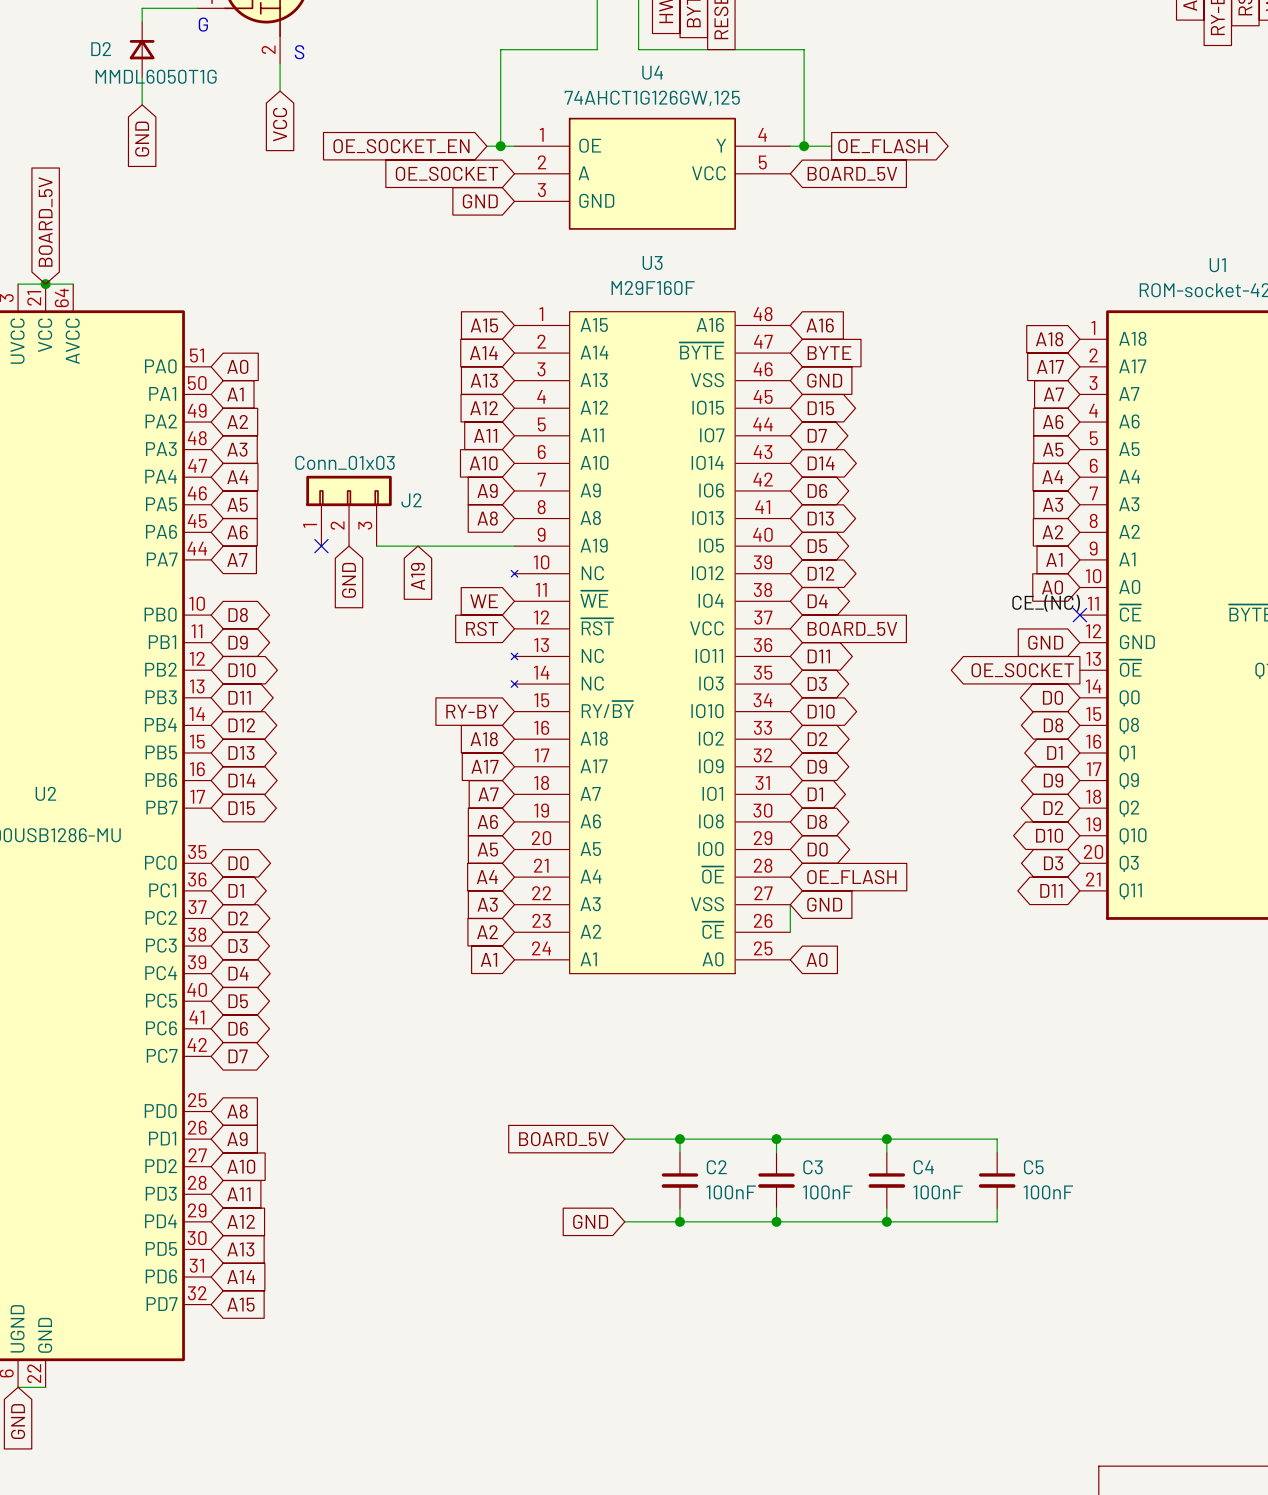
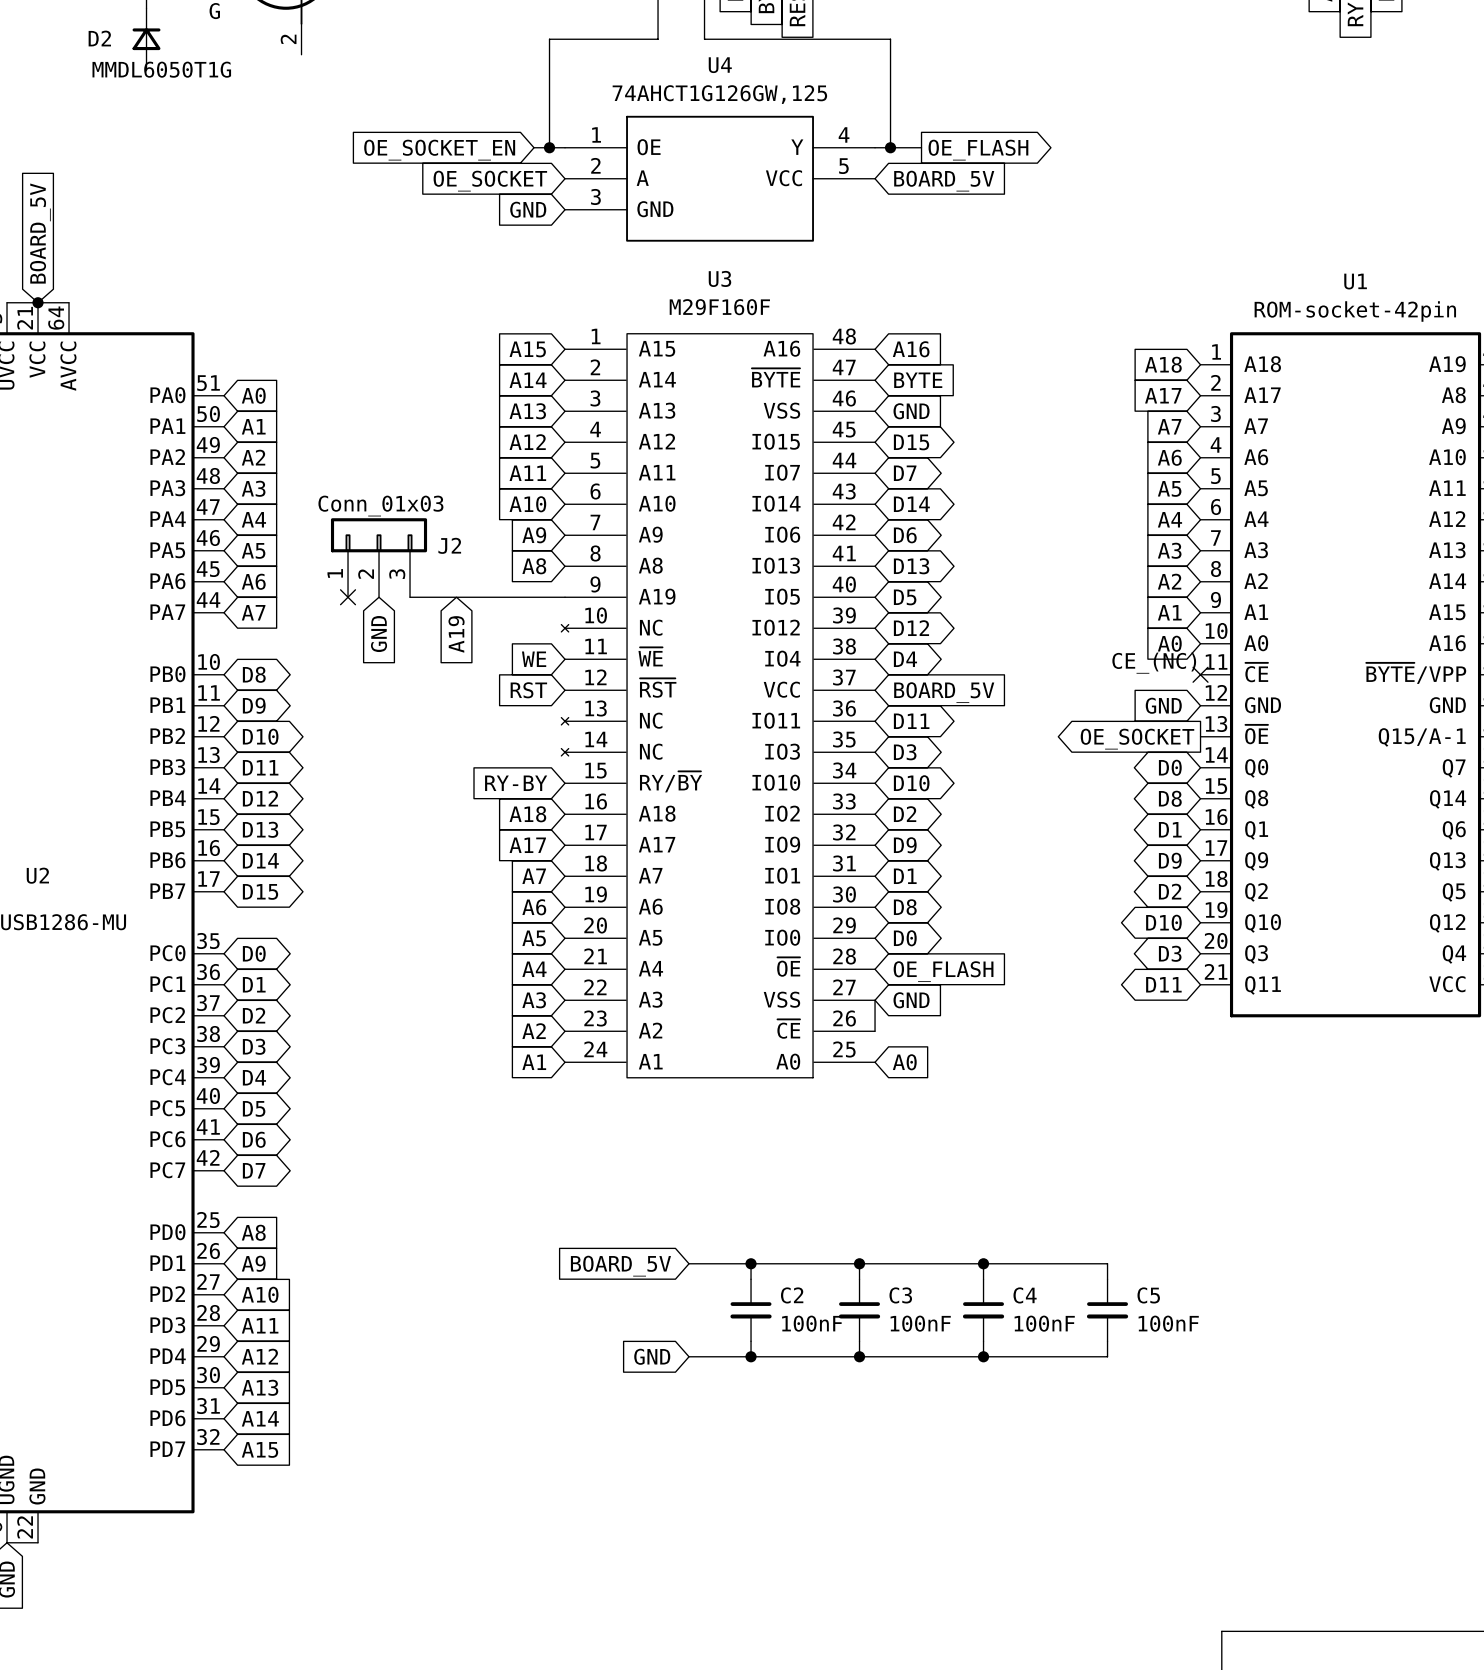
text: S (299, 52) -> none
wire: (280, 63) (280, 91) -> none
wire: (142, 77) (142, 104) -> none
global label: VCC (280, 124) -> none
global label: GND (142, 139) -> none

